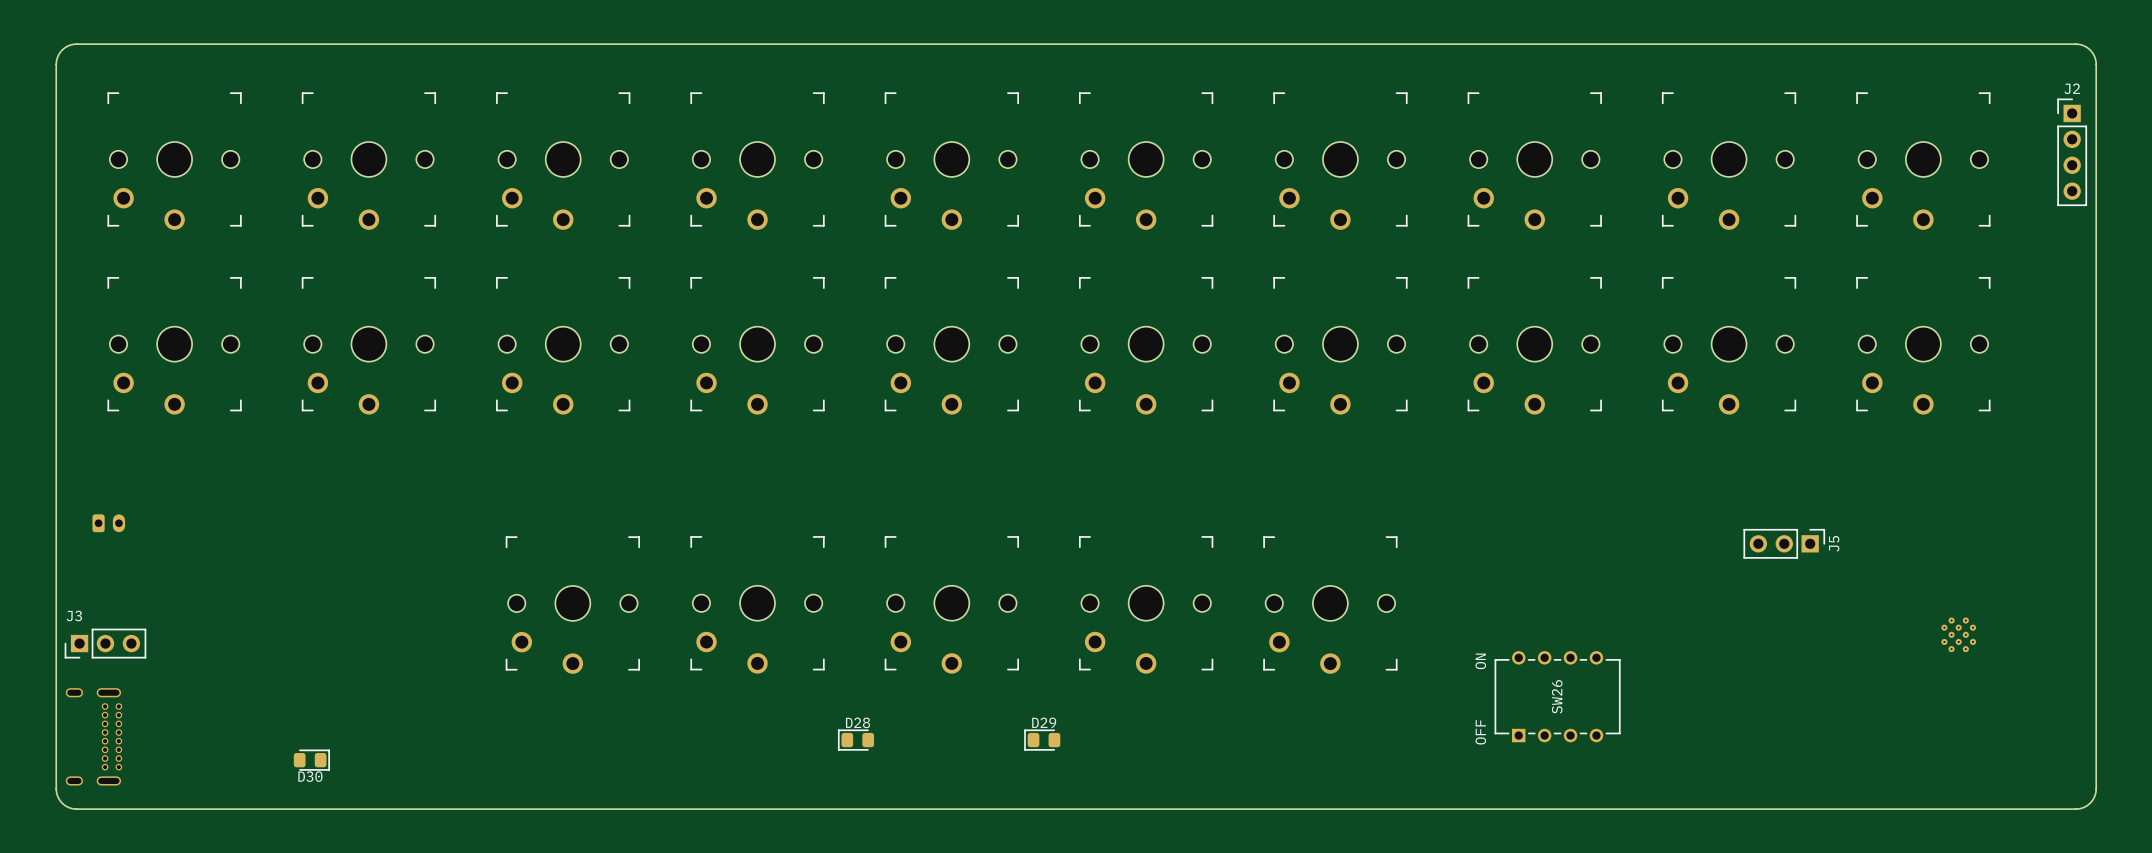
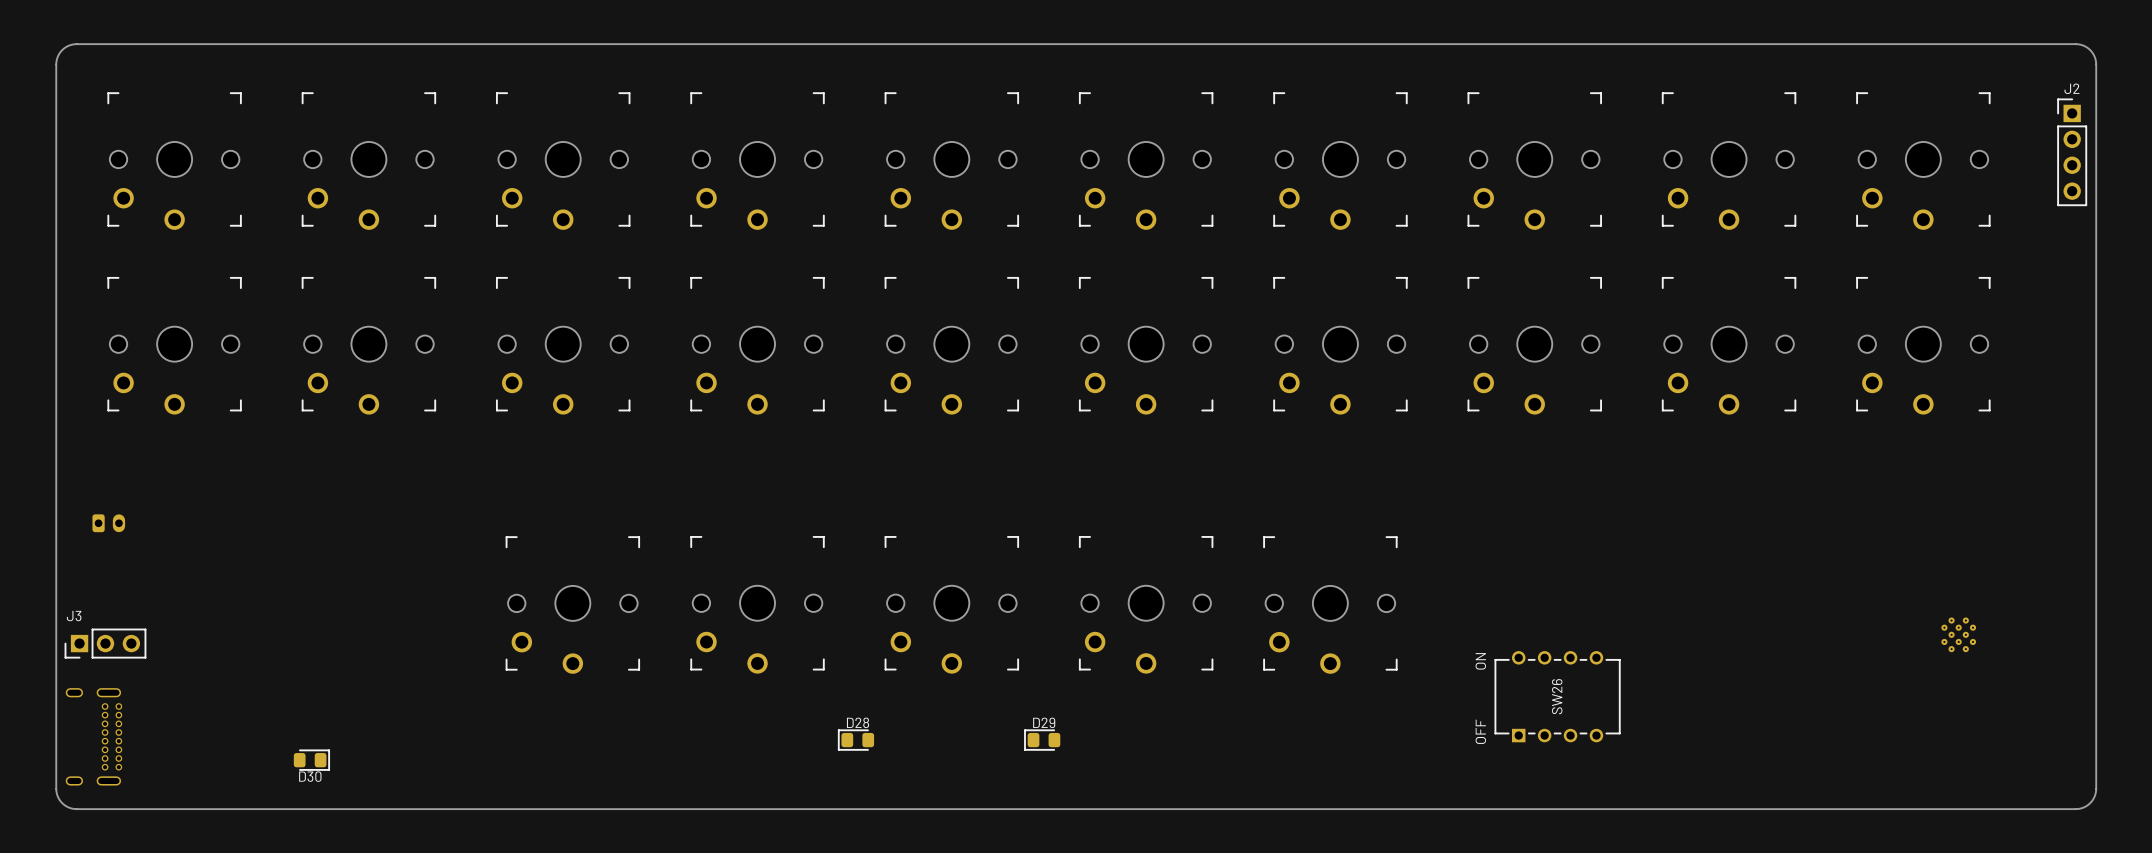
J5: (1784, 543) -> none

